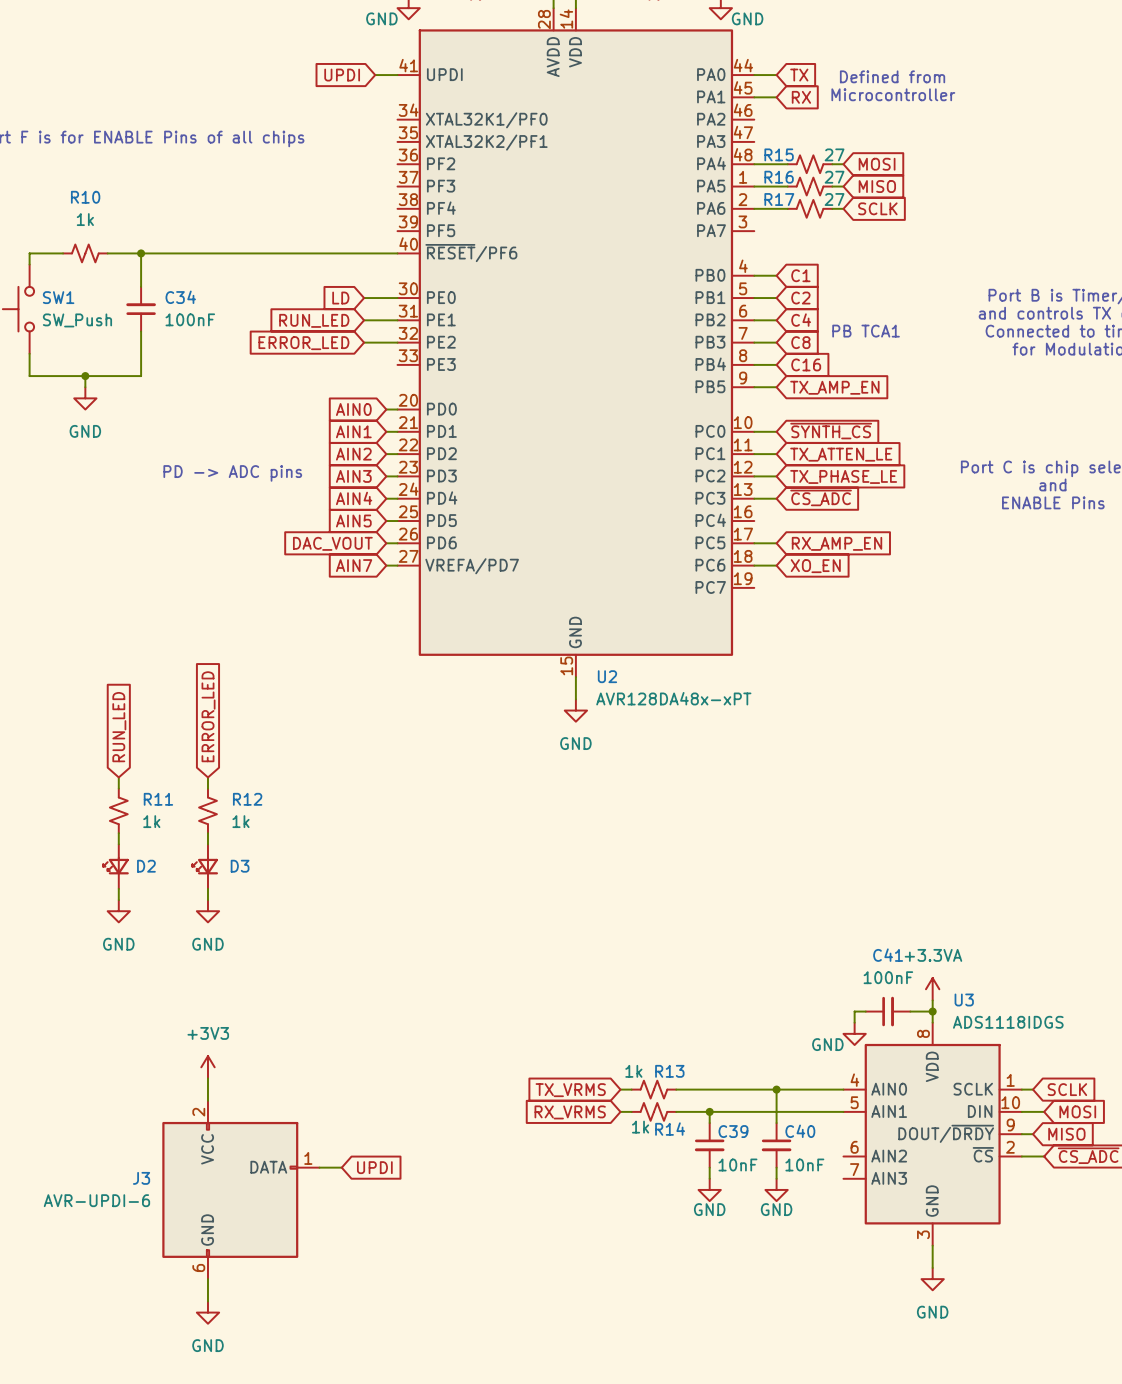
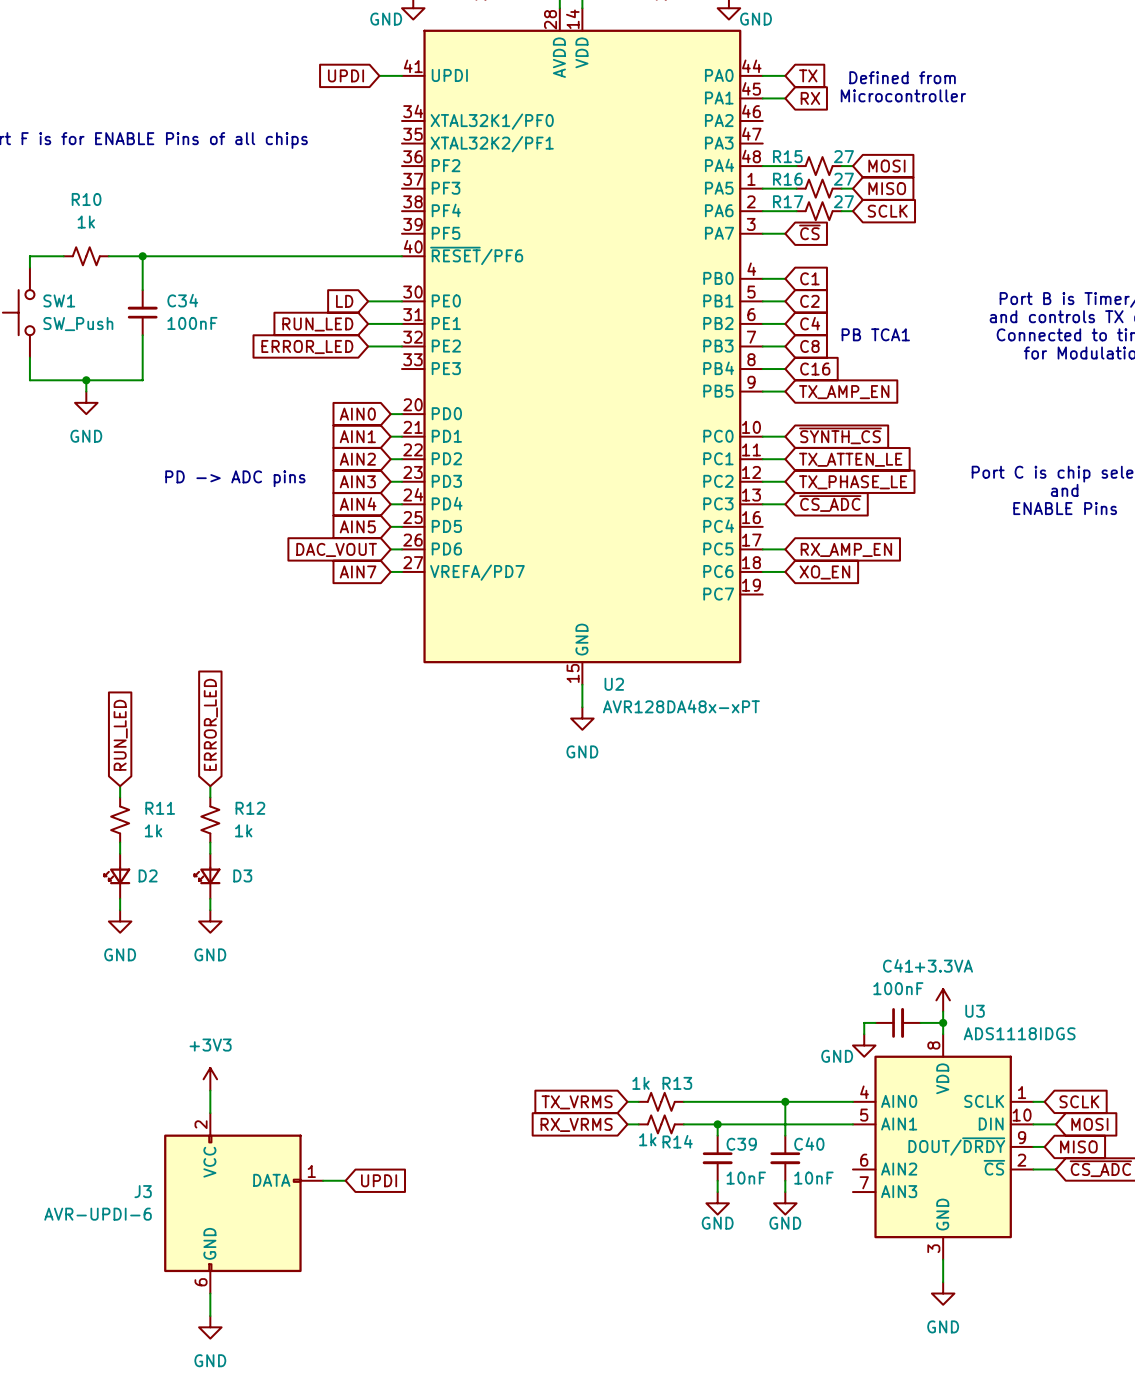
global label: none -> ~{CS} (809, 232)
wire: none -> (762, 233) (785, 233)

